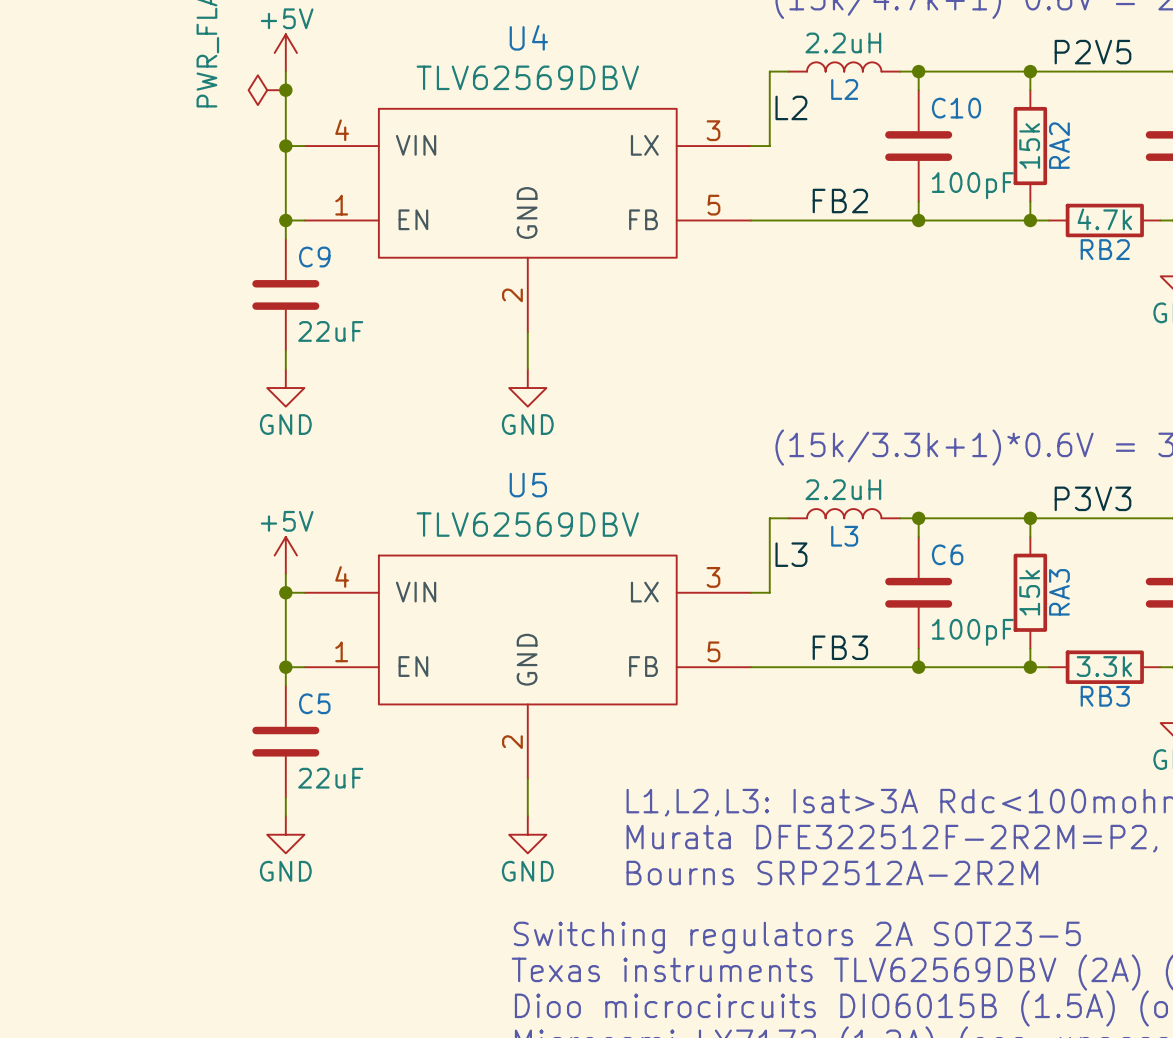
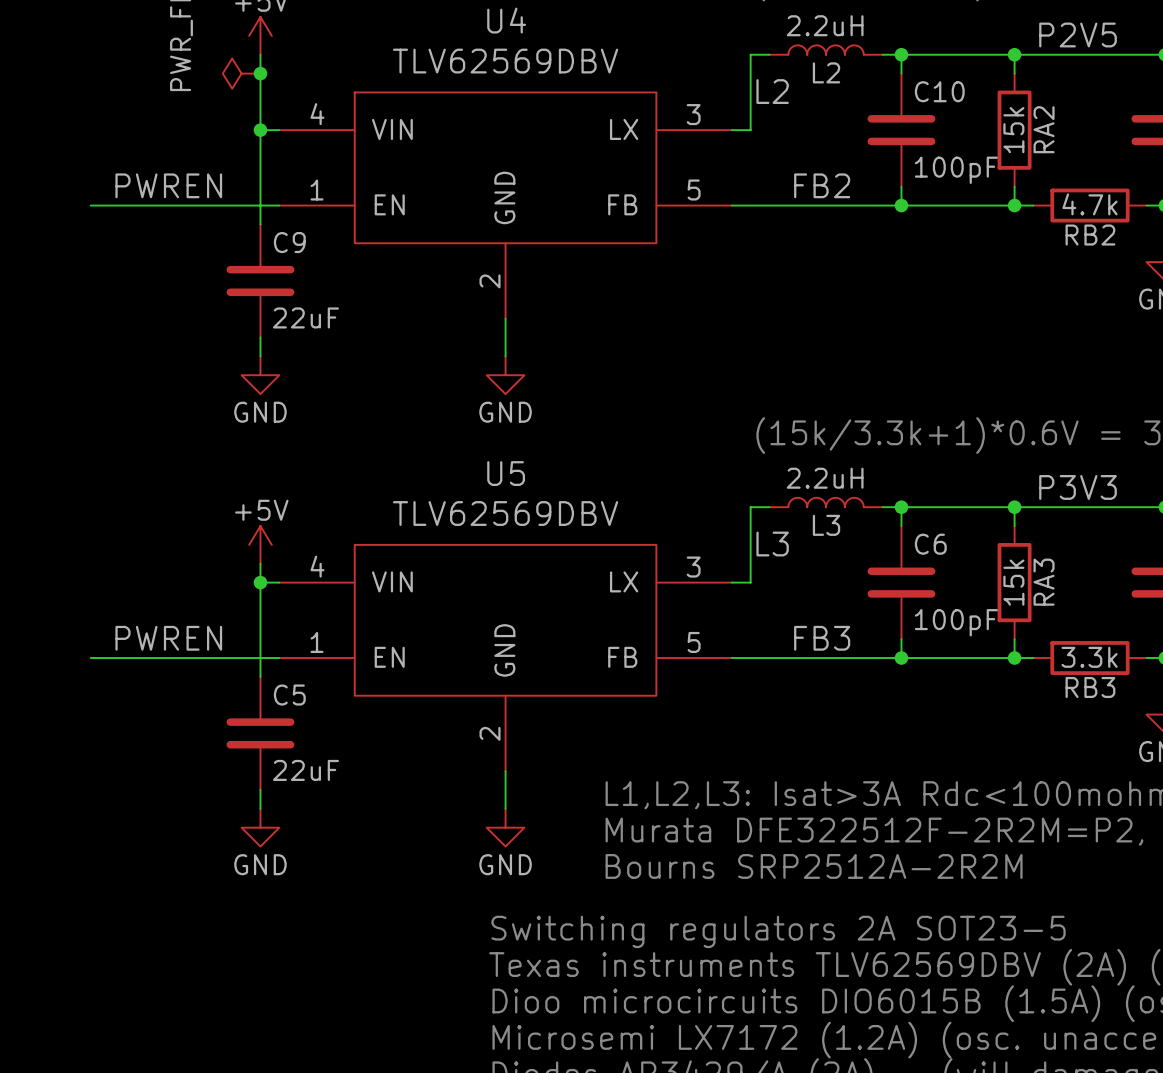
label: none -> PWREN (168, 185)
wire: none -> (90, 205) (260, 205)
junction: (285, 220) -> none
label: none -> PWREN (168, 638)
wire: none -> (90, 658) (260, 658)
junction: (285, 667) -> none

